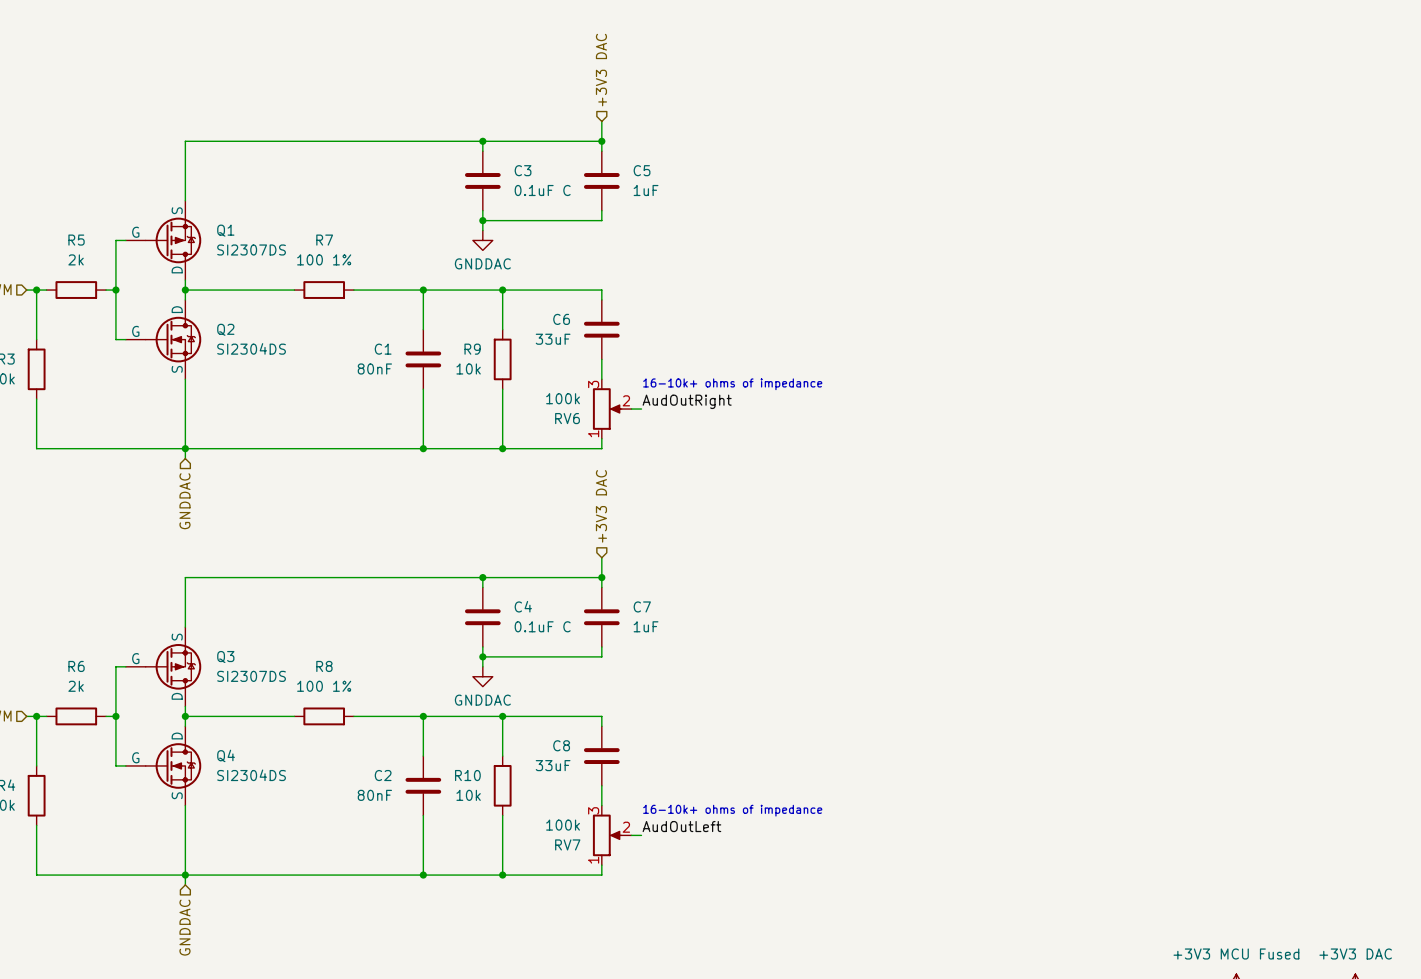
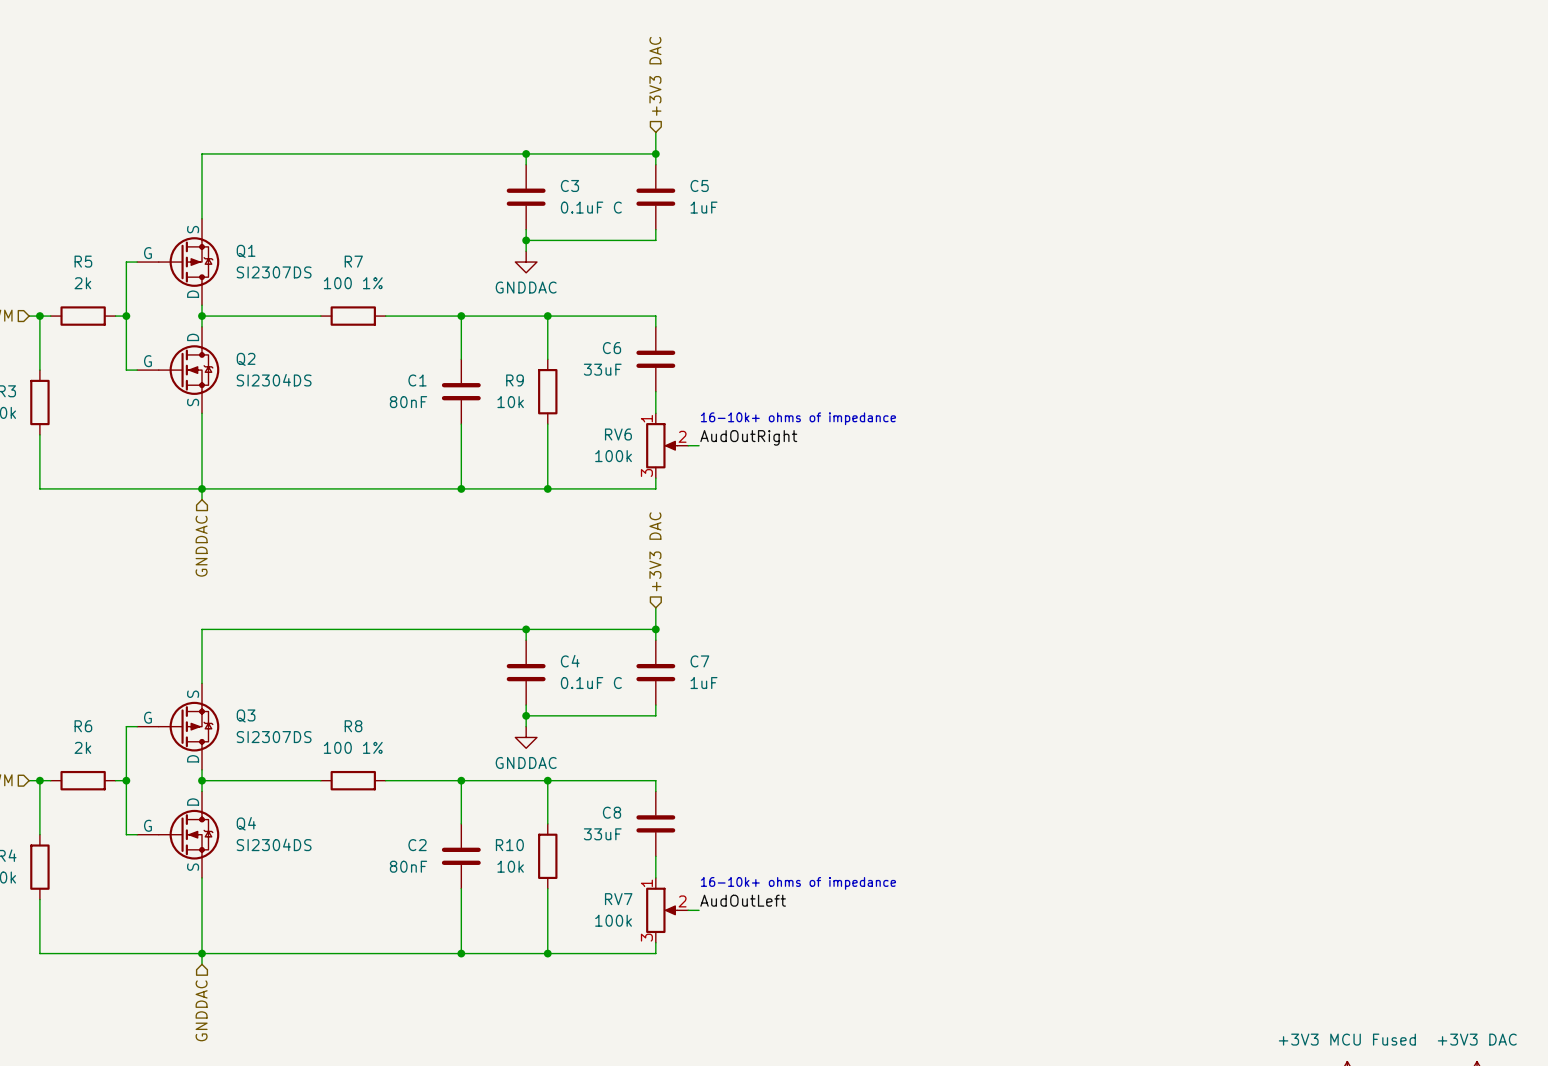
RV6 flip: as is (607, 409) -> up-down (661, 445)
RV7 flip: as is (607, 835) -> up-down (661, 910)

